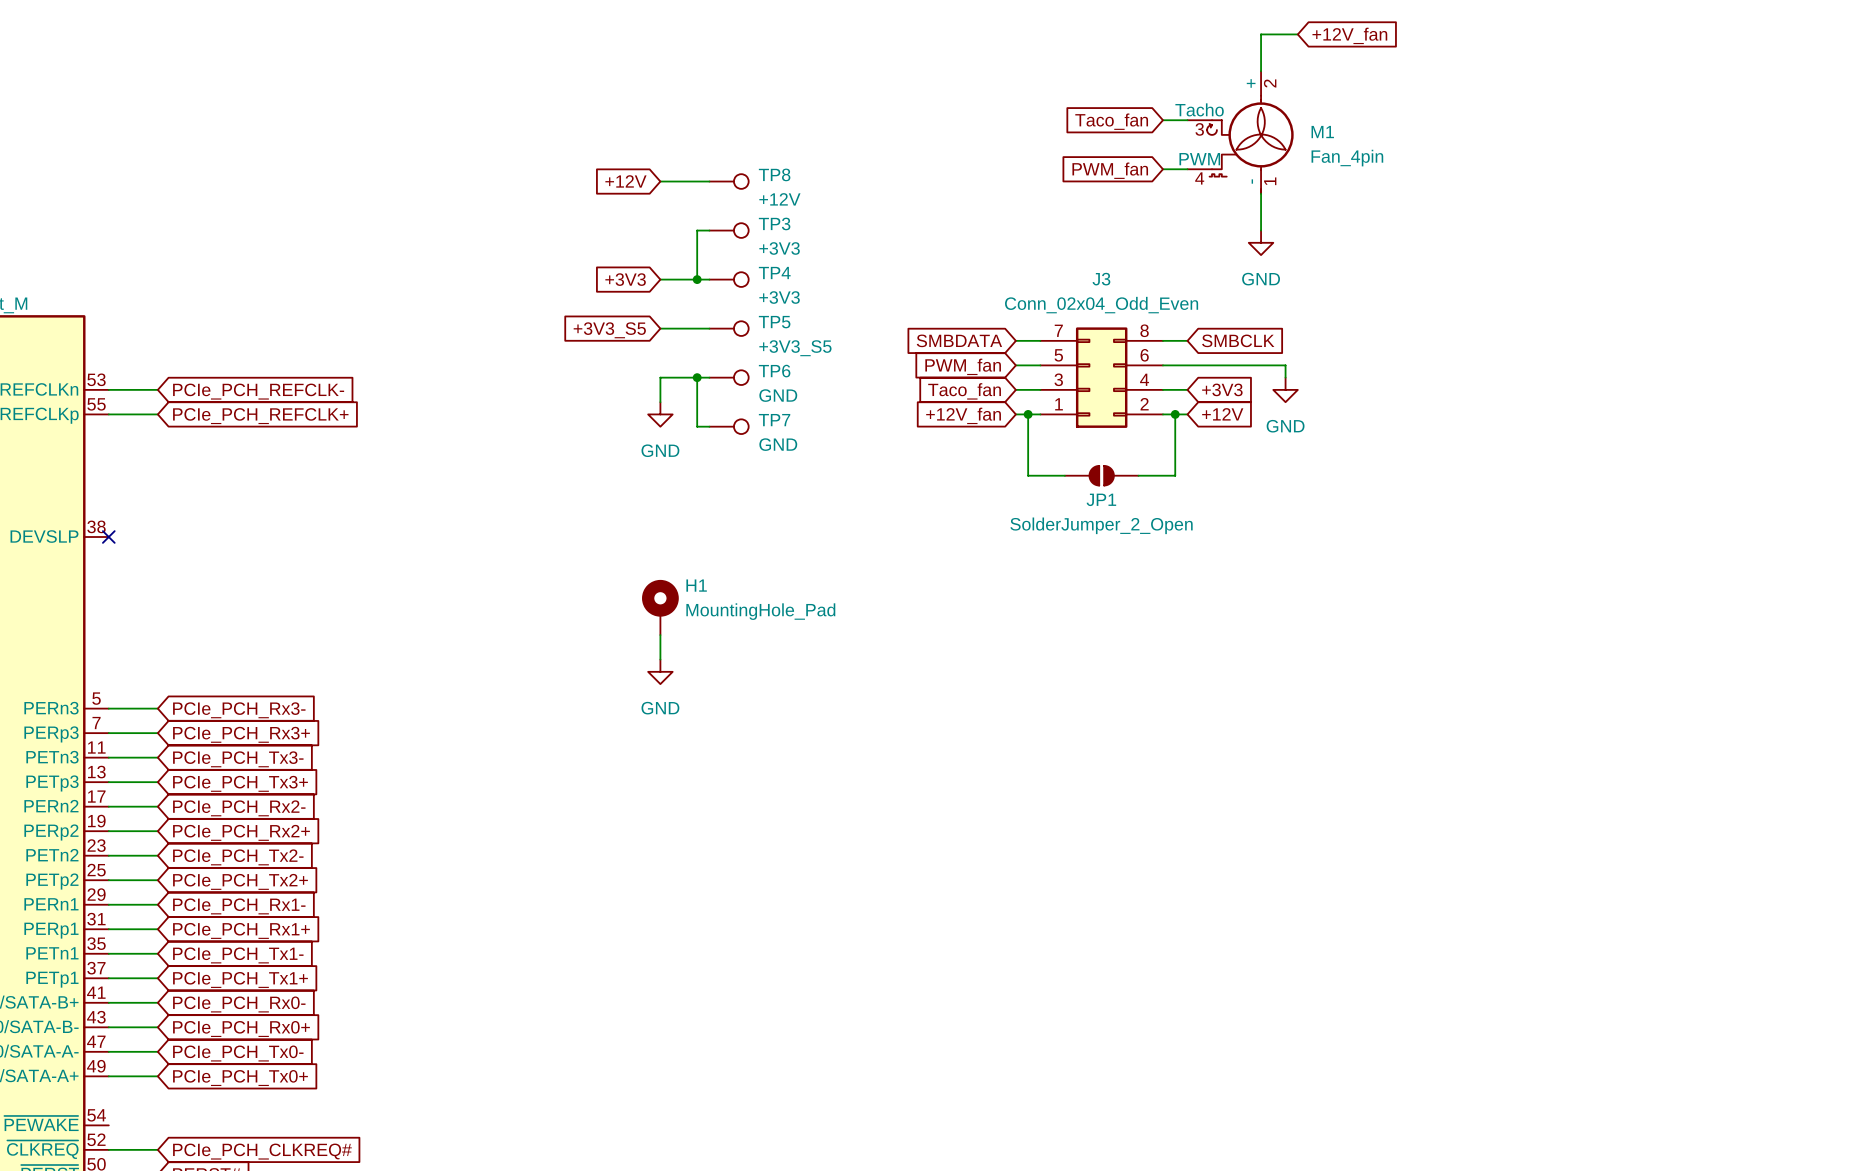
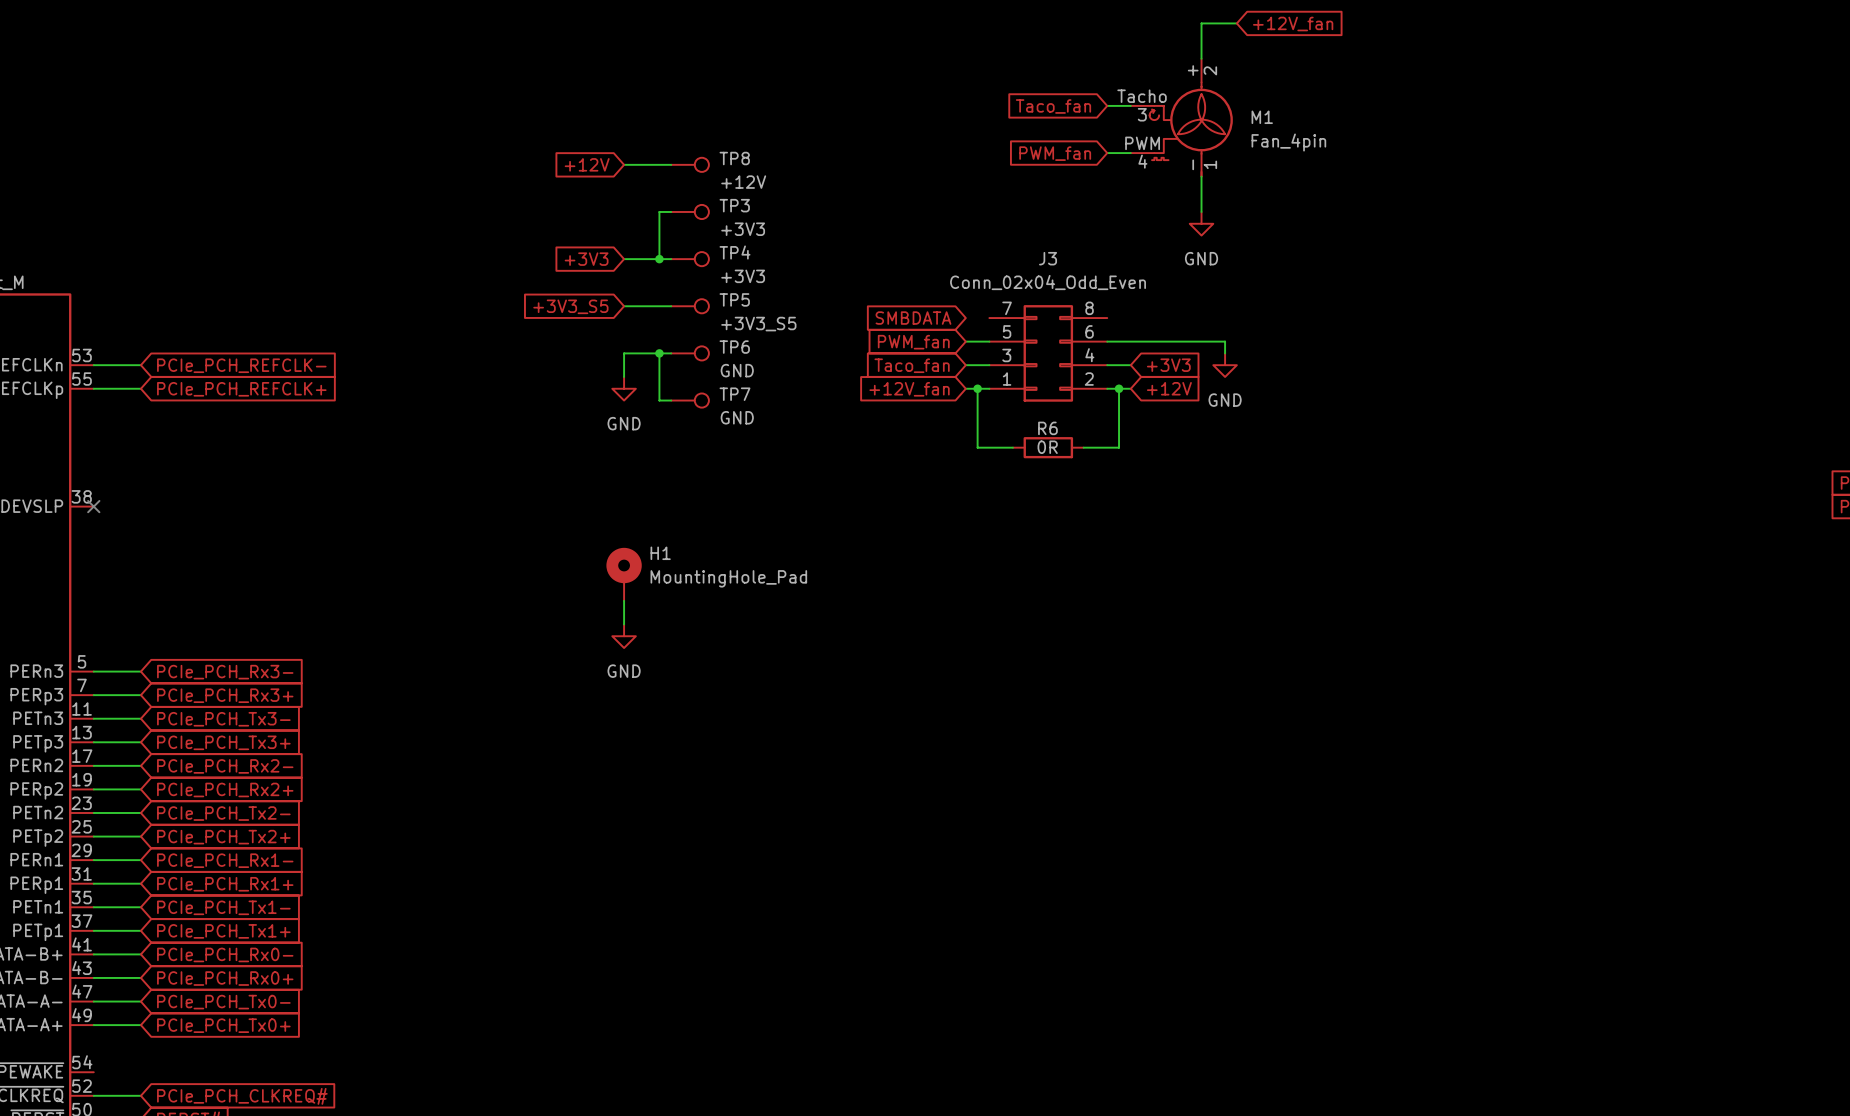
wire: (1015, 340) (1040, 340) -> none
wire: (1162, 340) (1187, 340) -> none
global label: SMBCLK (1238, 340) -> none
JP1: SolderJumper_2_Open (1101, 475) -> none
R6: none -> 0R (1048, 447)

